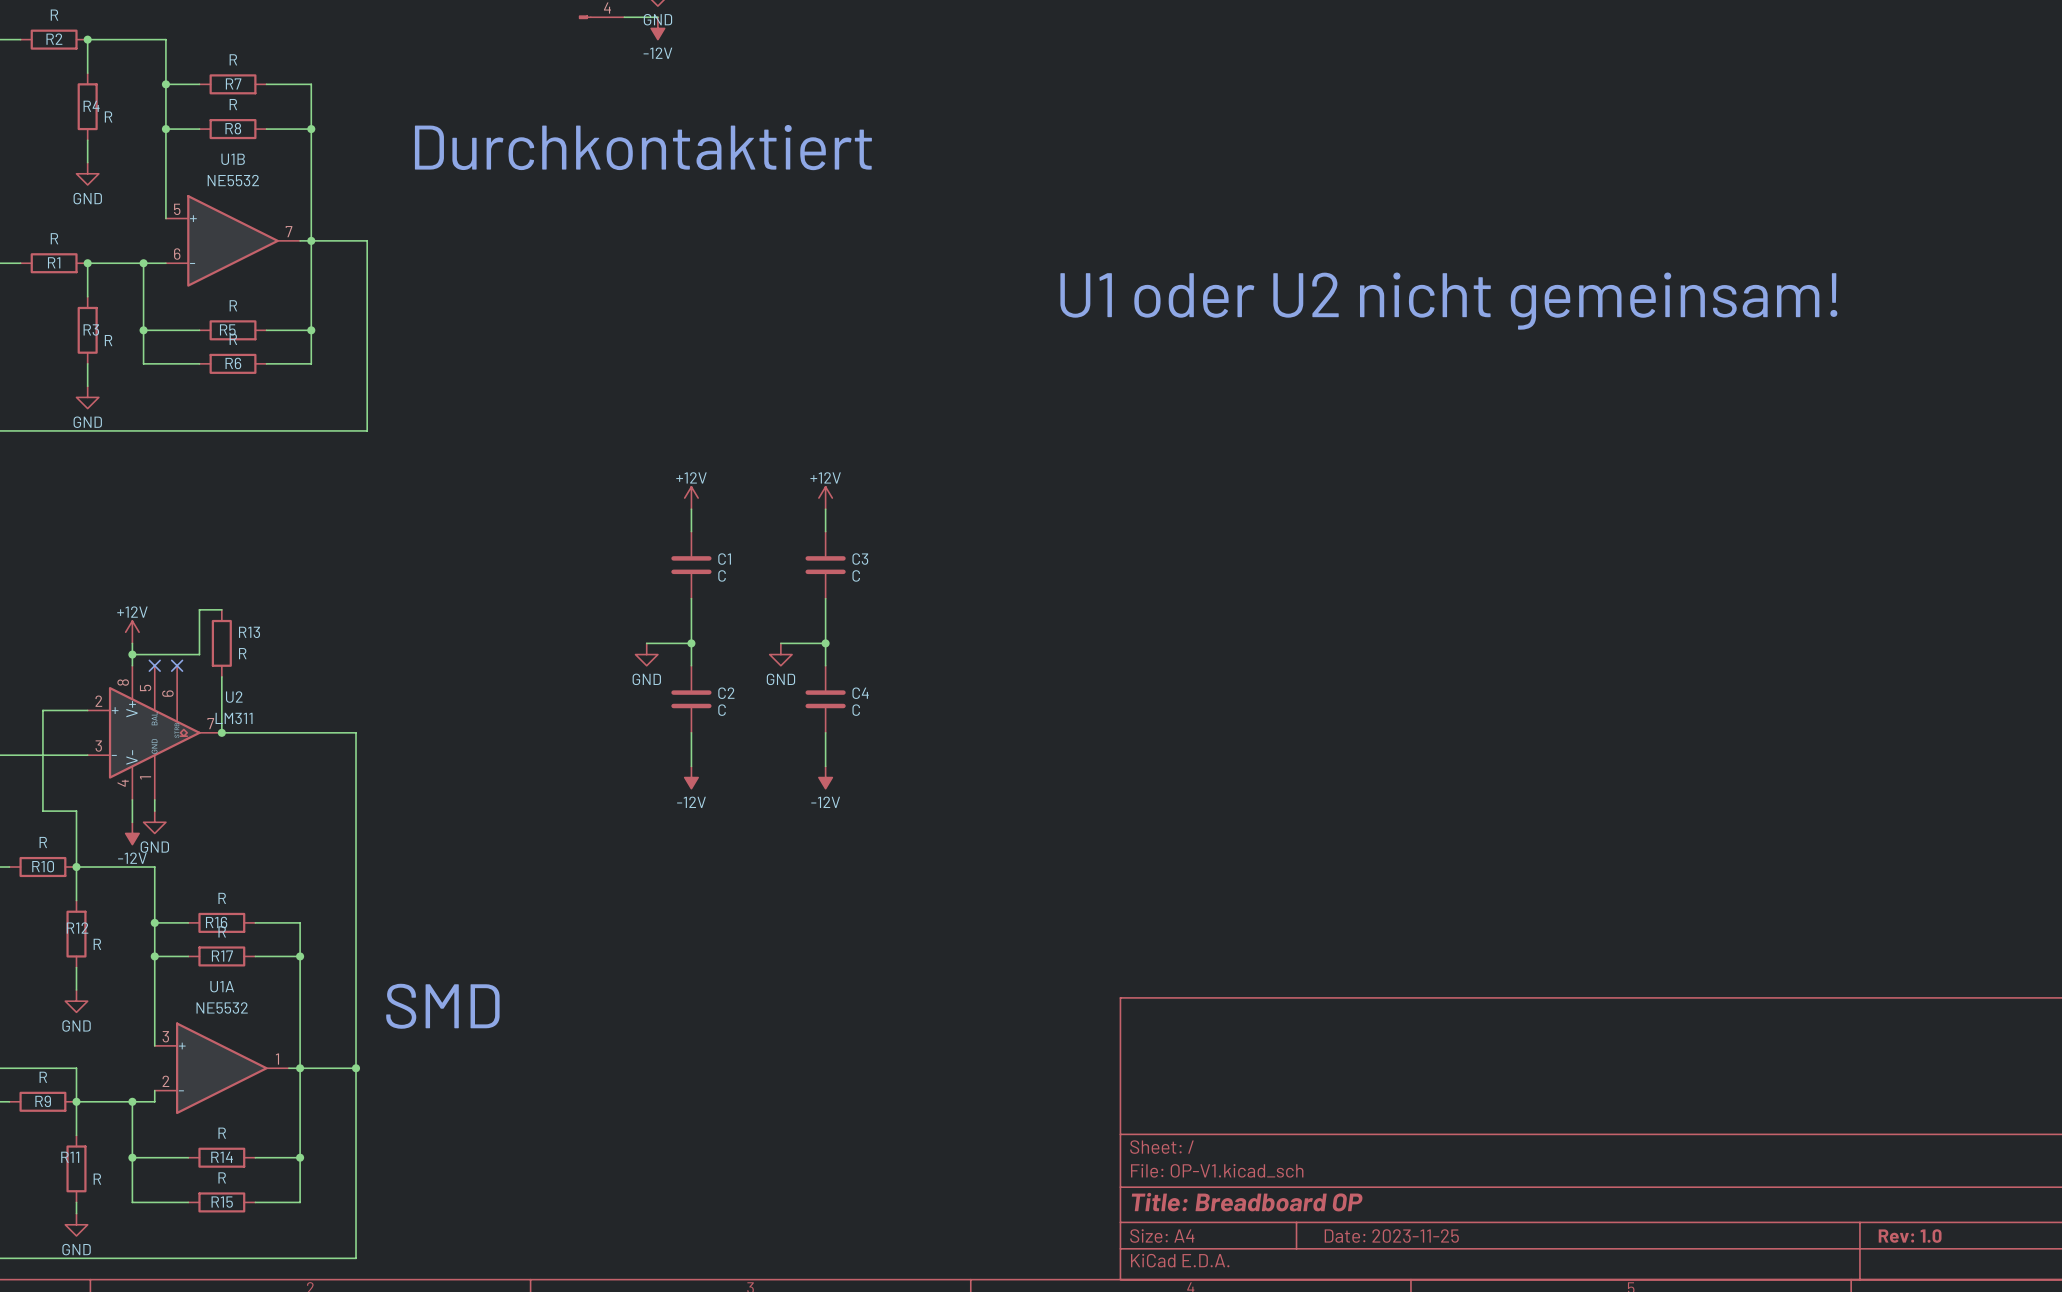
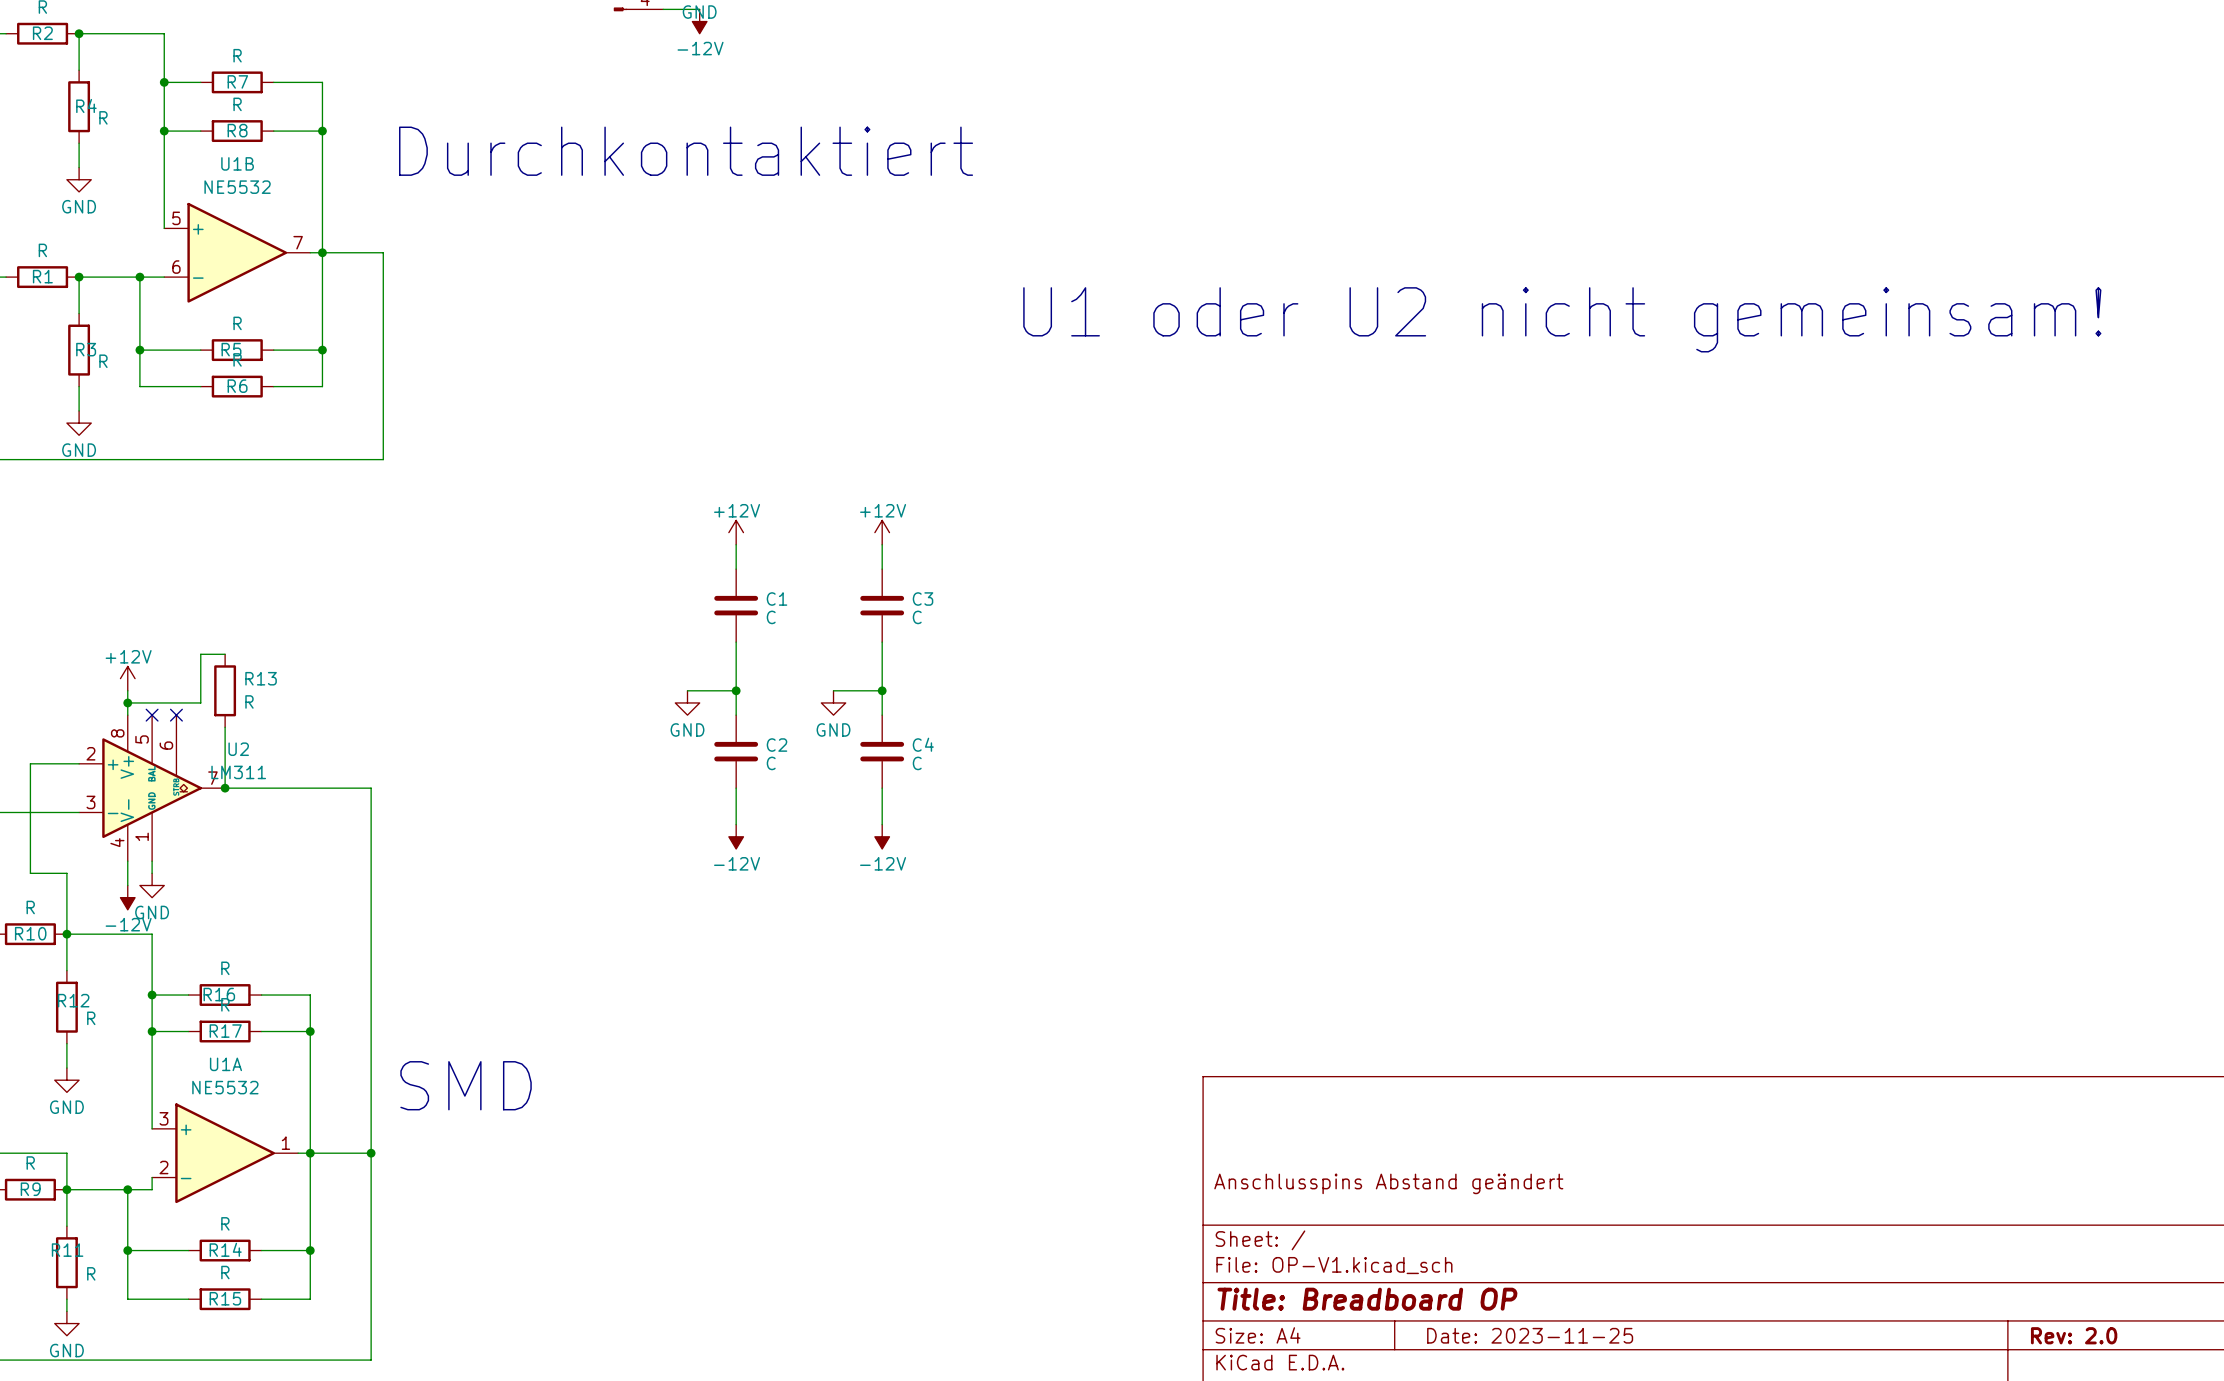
title block: none -> Anschlusspins Abstand geändert (1388, 1183)
title block: Rev: 1.0 (1910, 1236) -> Rev: 2.0 (2074, 1335)

